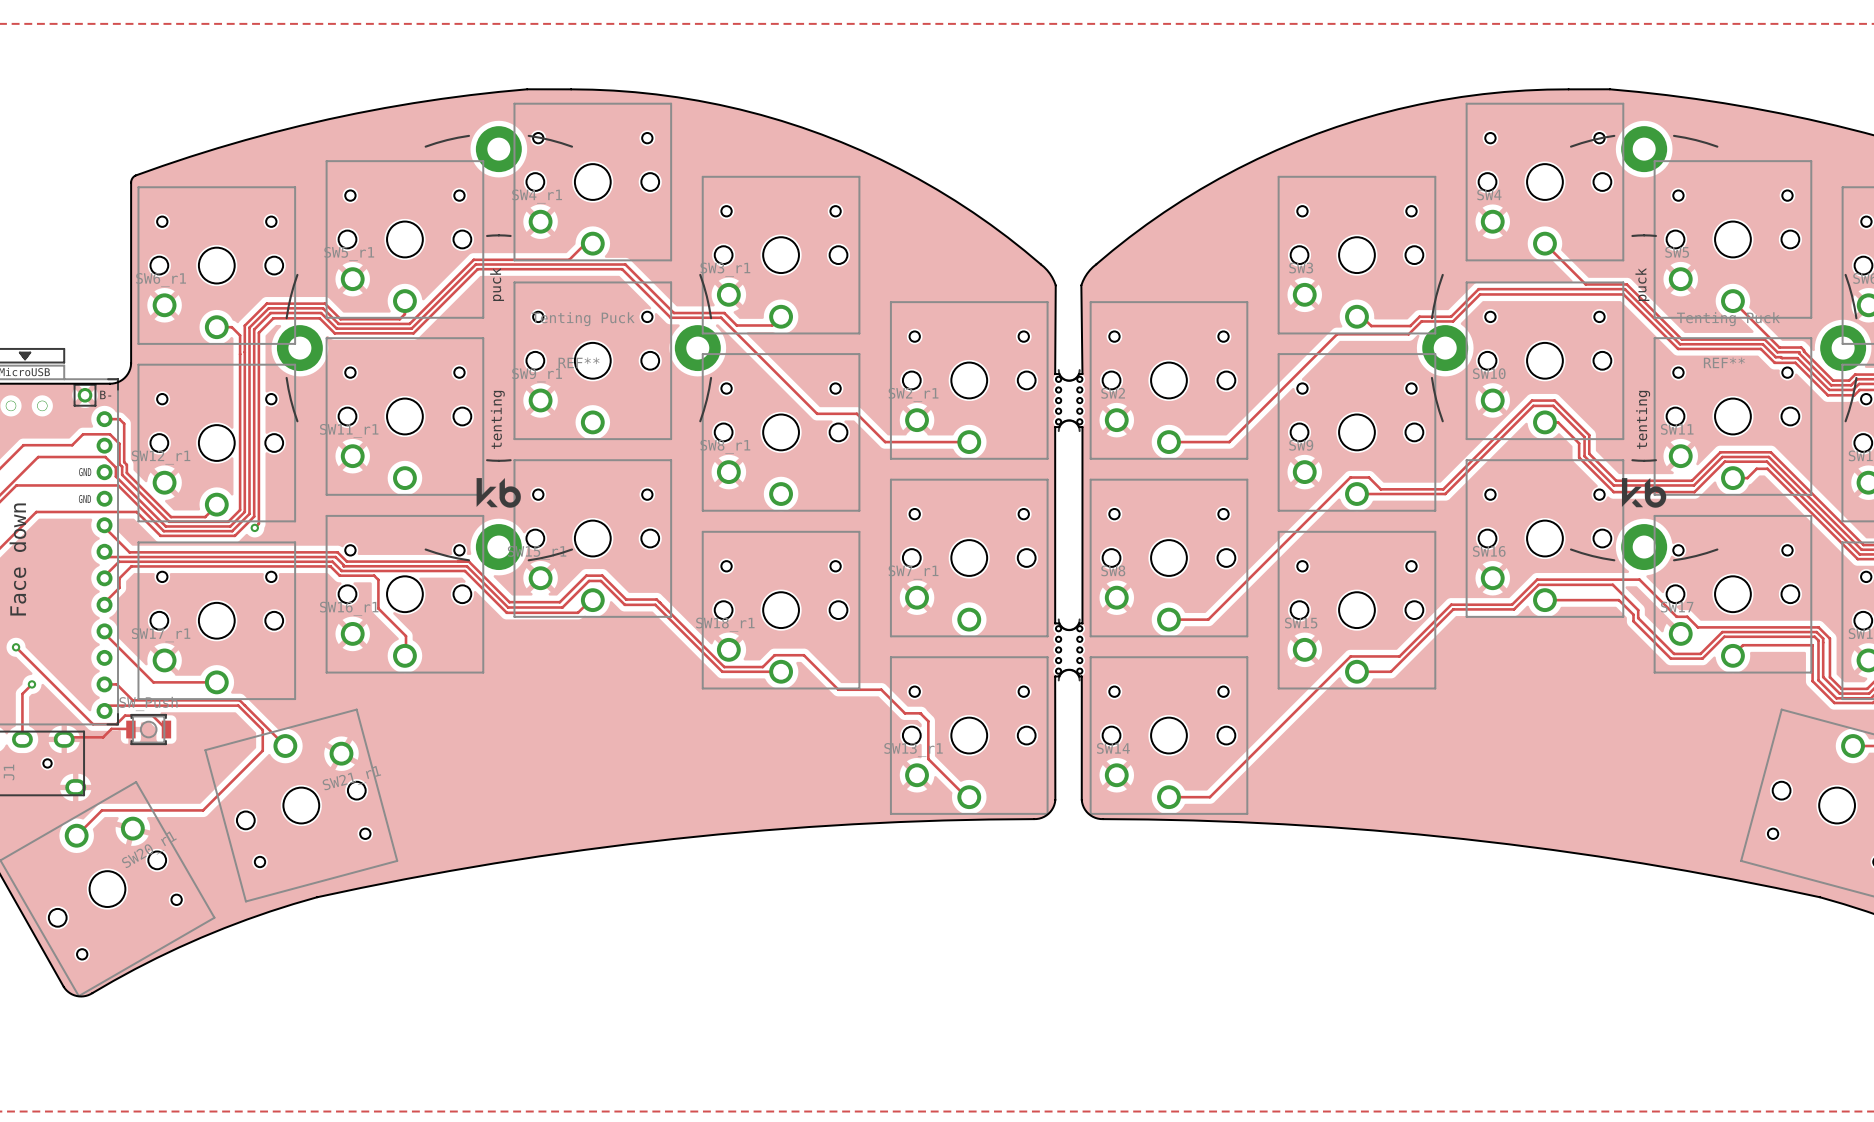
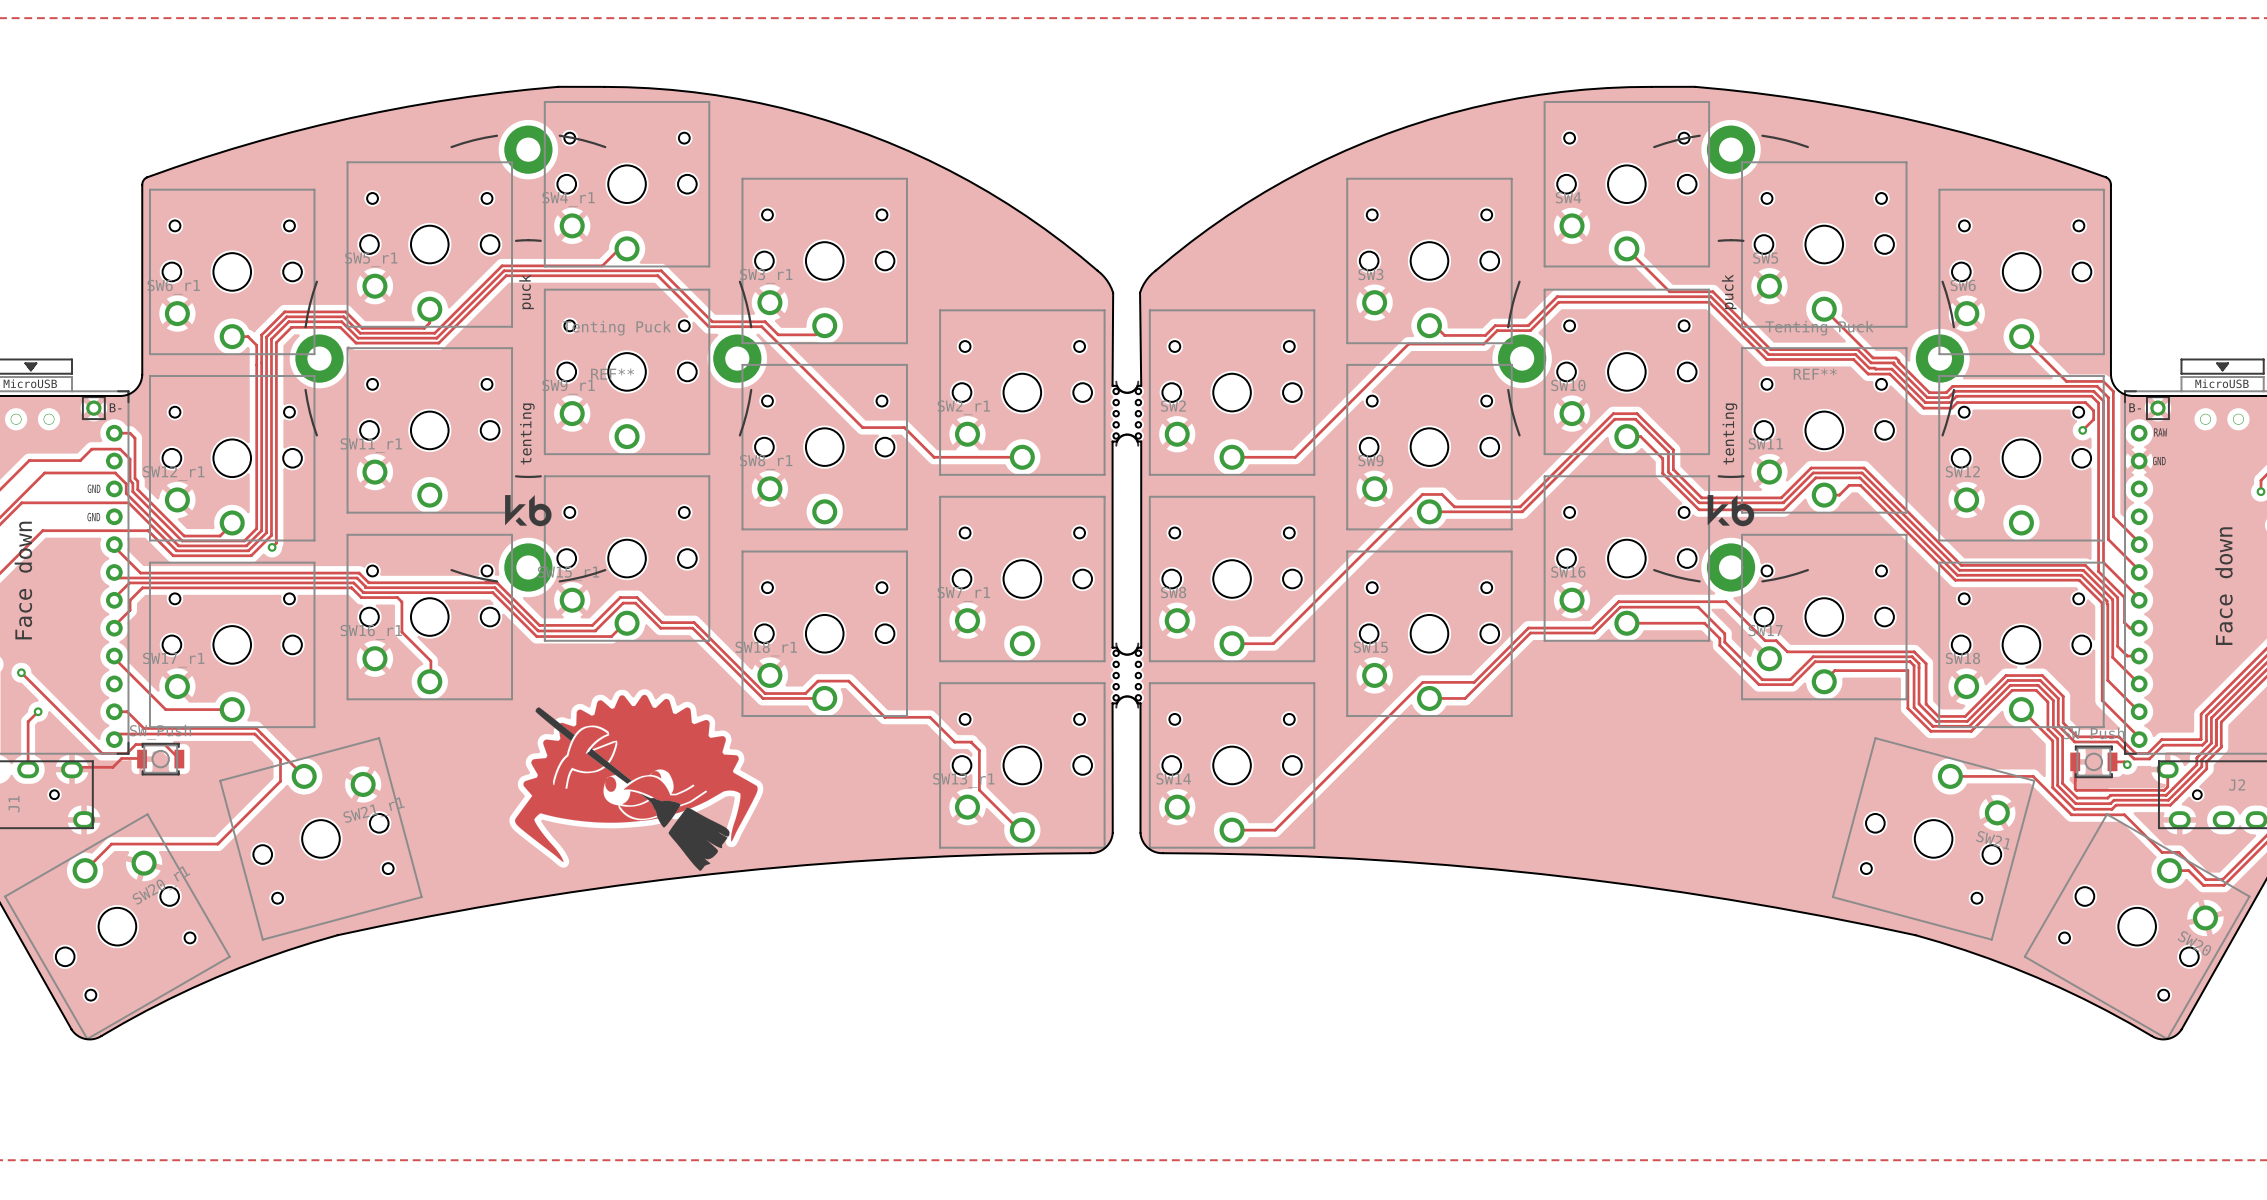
drawing: none -> [515, 694, 758, 871]

